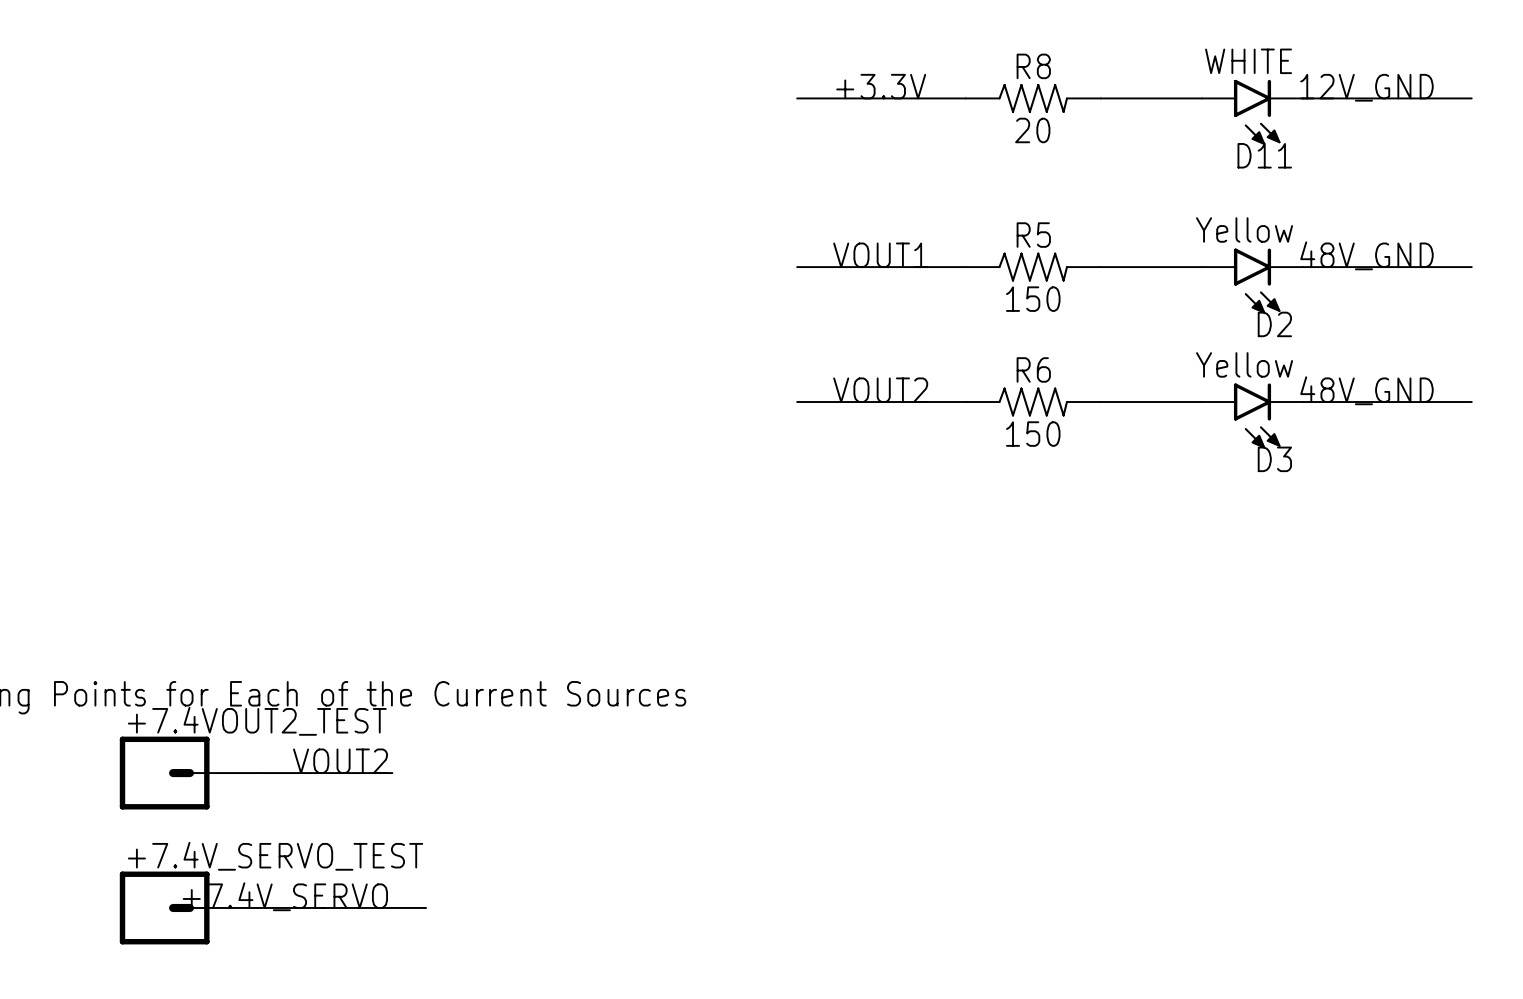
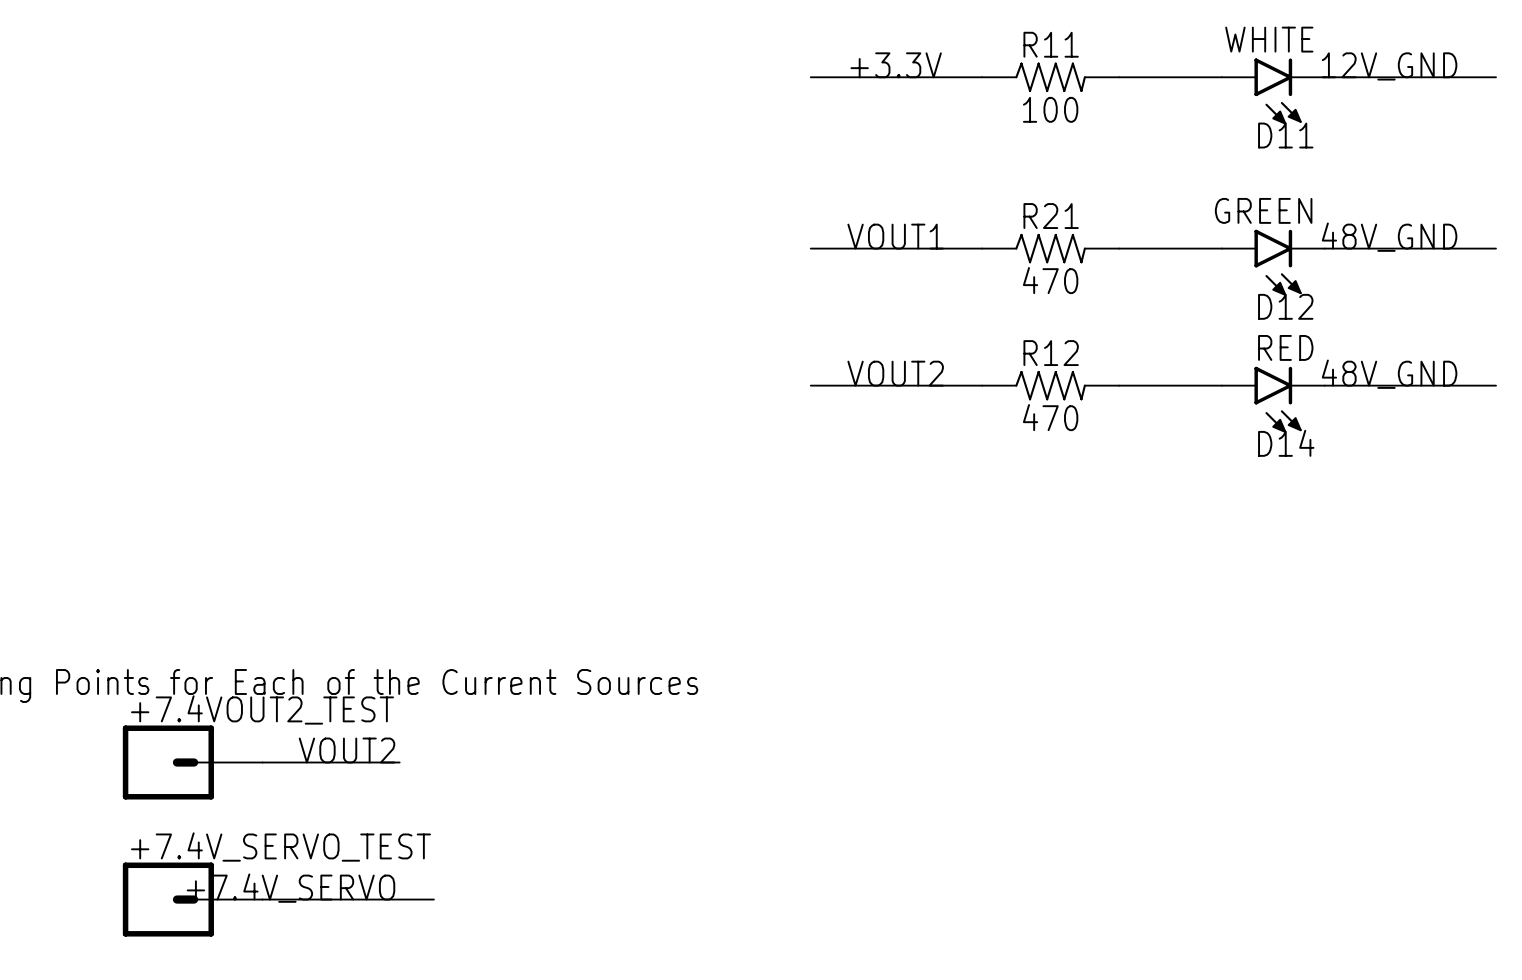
R8 name: R8 (1033, 66) -> R11 (1051, 44)
R8 value: 20 (1032, 130) -> 100 (1050, 109)
D2 value: Yellow (1244, 229) -> GREEN (1263, 210)
R5 name: R5 (1033, 235) -> R21 (1051, 216)
R5 value: 150 (1033, 299) -> 470 (1050, 280)
D2 name: D2 (1274, 324) -> D12 (1285, 306)
D3 value: Yellow (1244, 364) -> RED (1285, 347)
R6 name: R6 (1033, 369) -> R12 (1051, 353)
R6 value: 150 (1033, 434) -> 470 (1050, 417)
D3 name: D3 (1274, 459) -> D14 (1286, 443)

